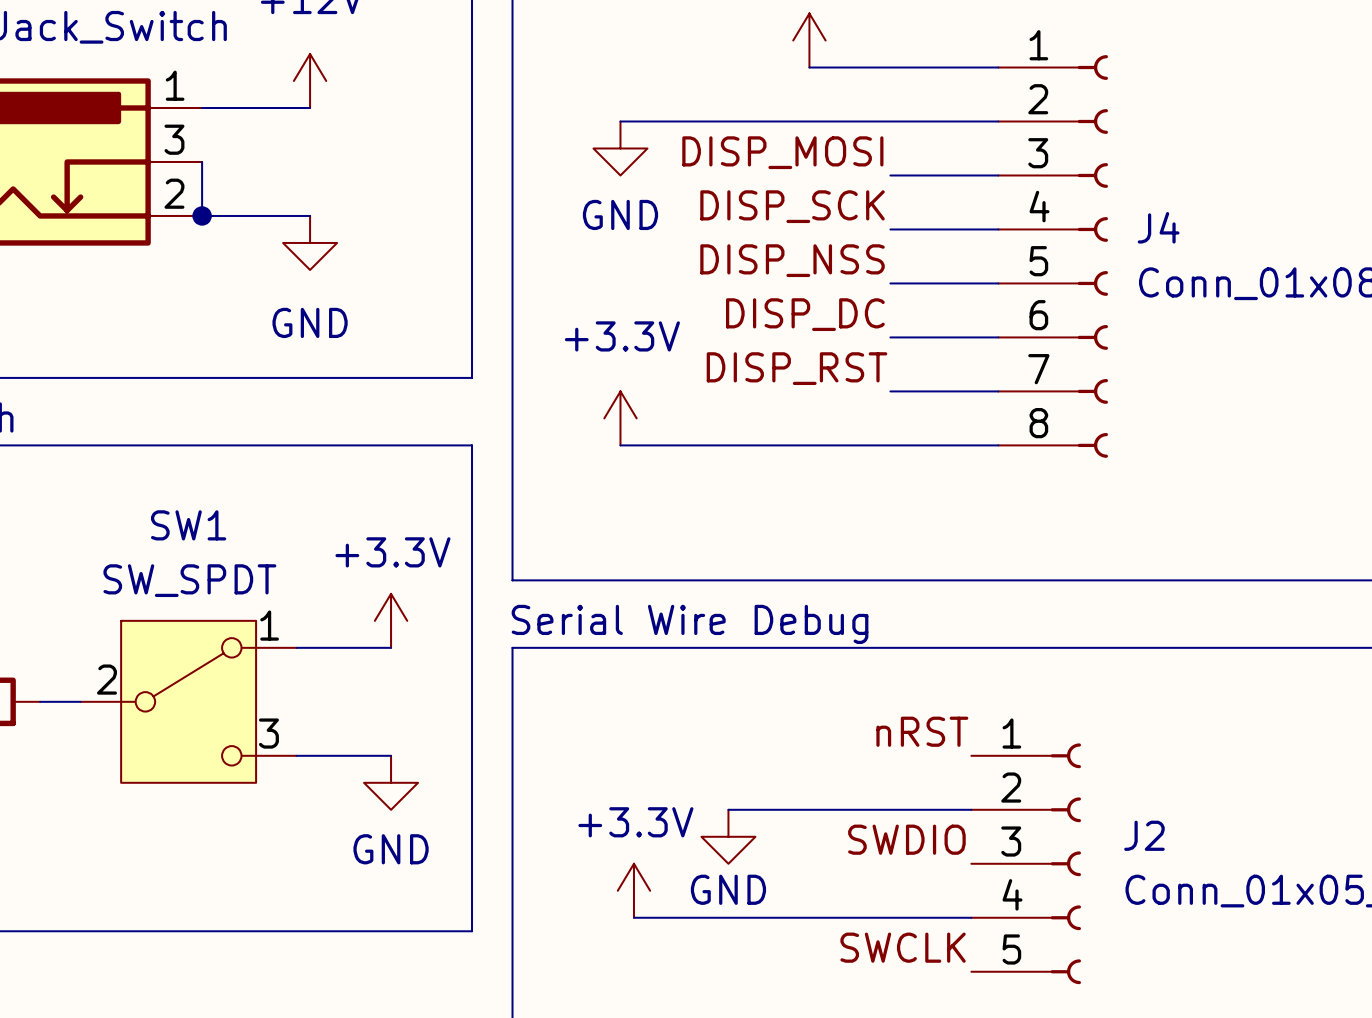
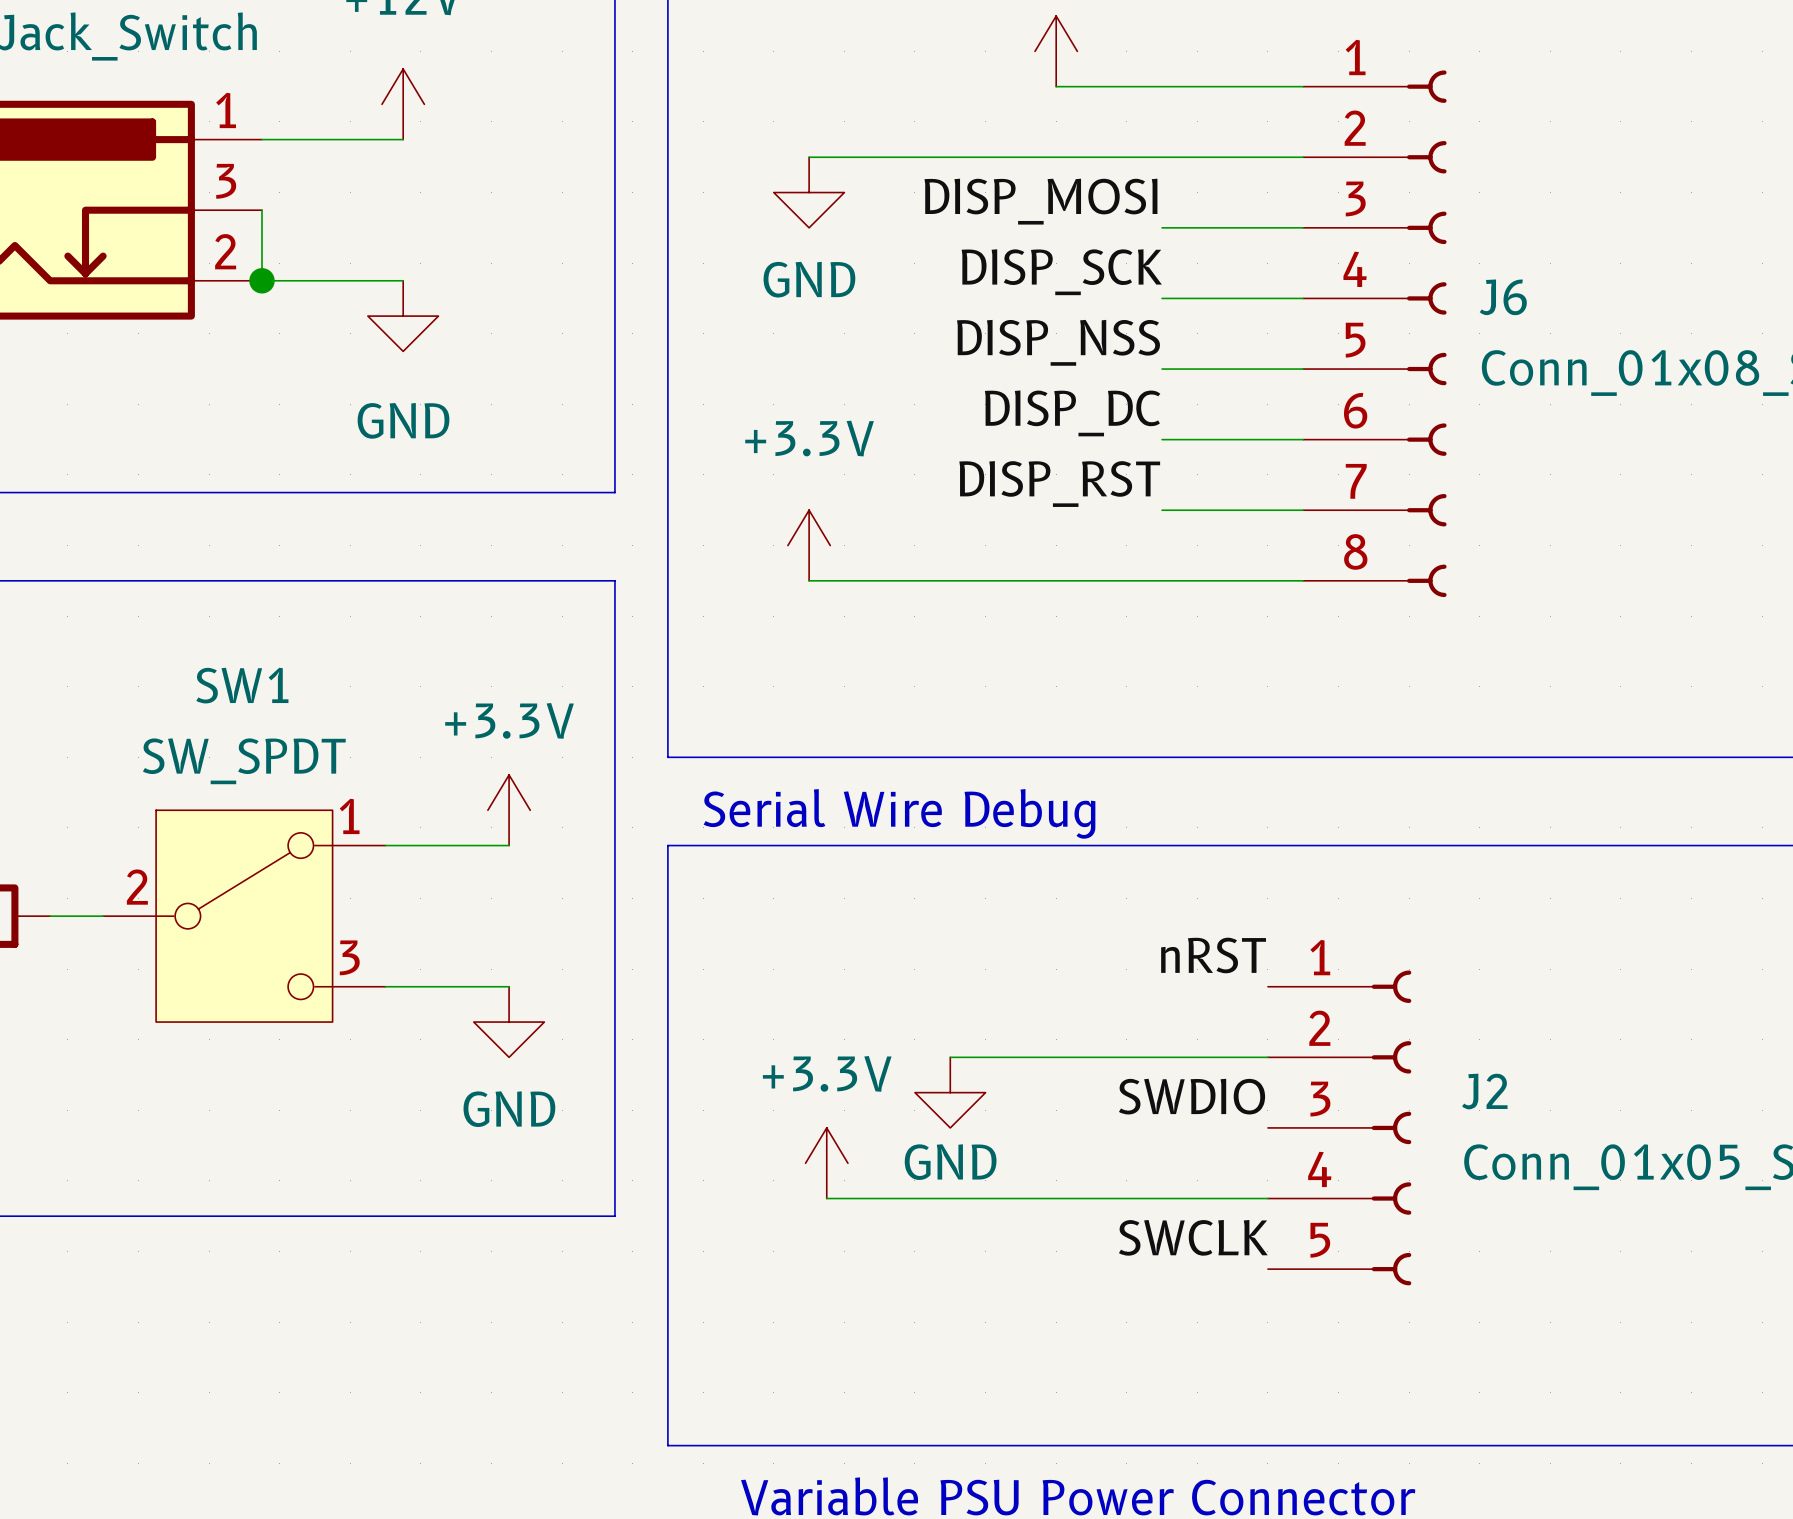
J4 name: J4 (1158, 227) -> J6 (1503, 297)

